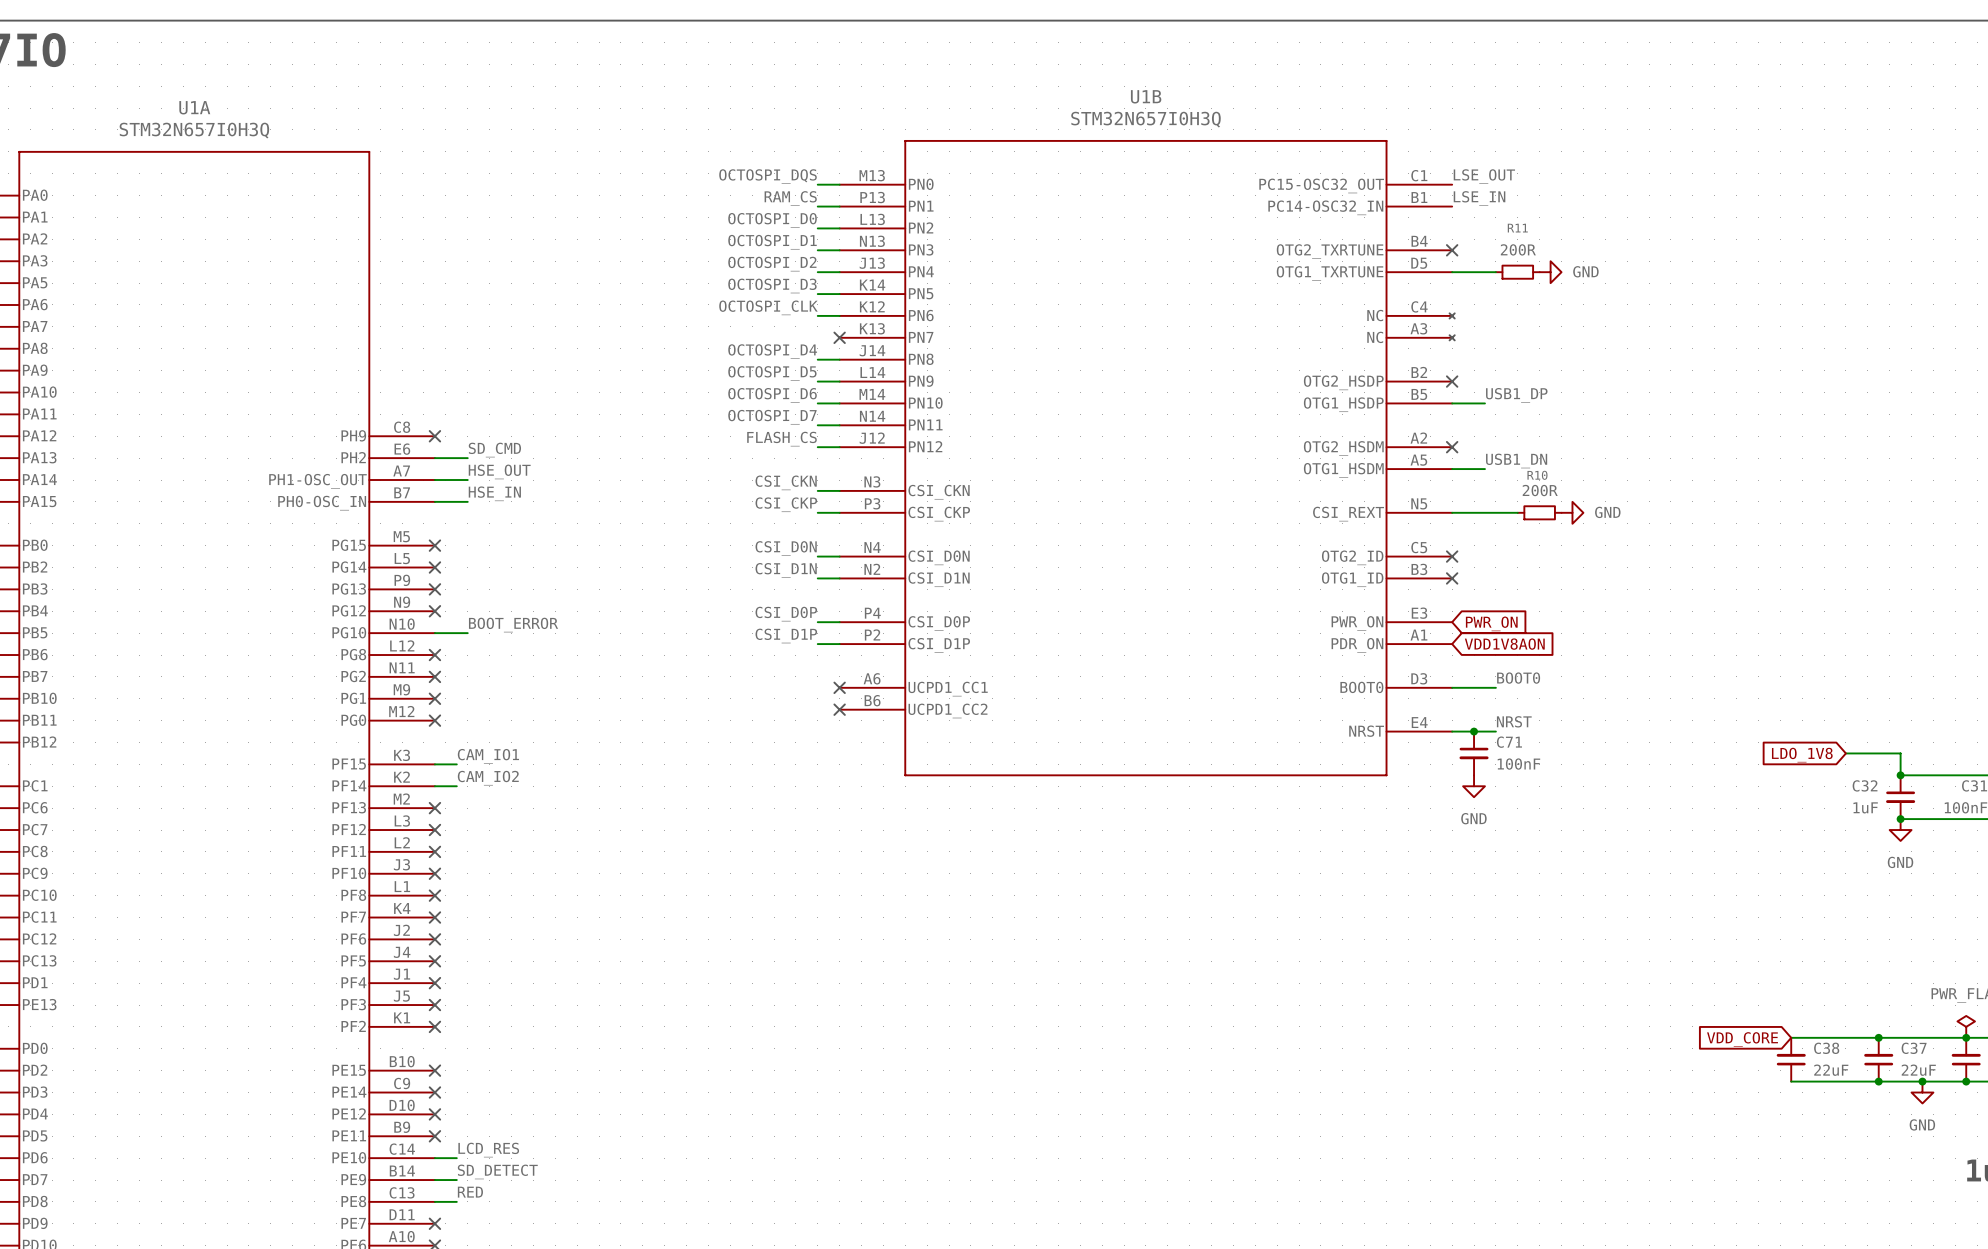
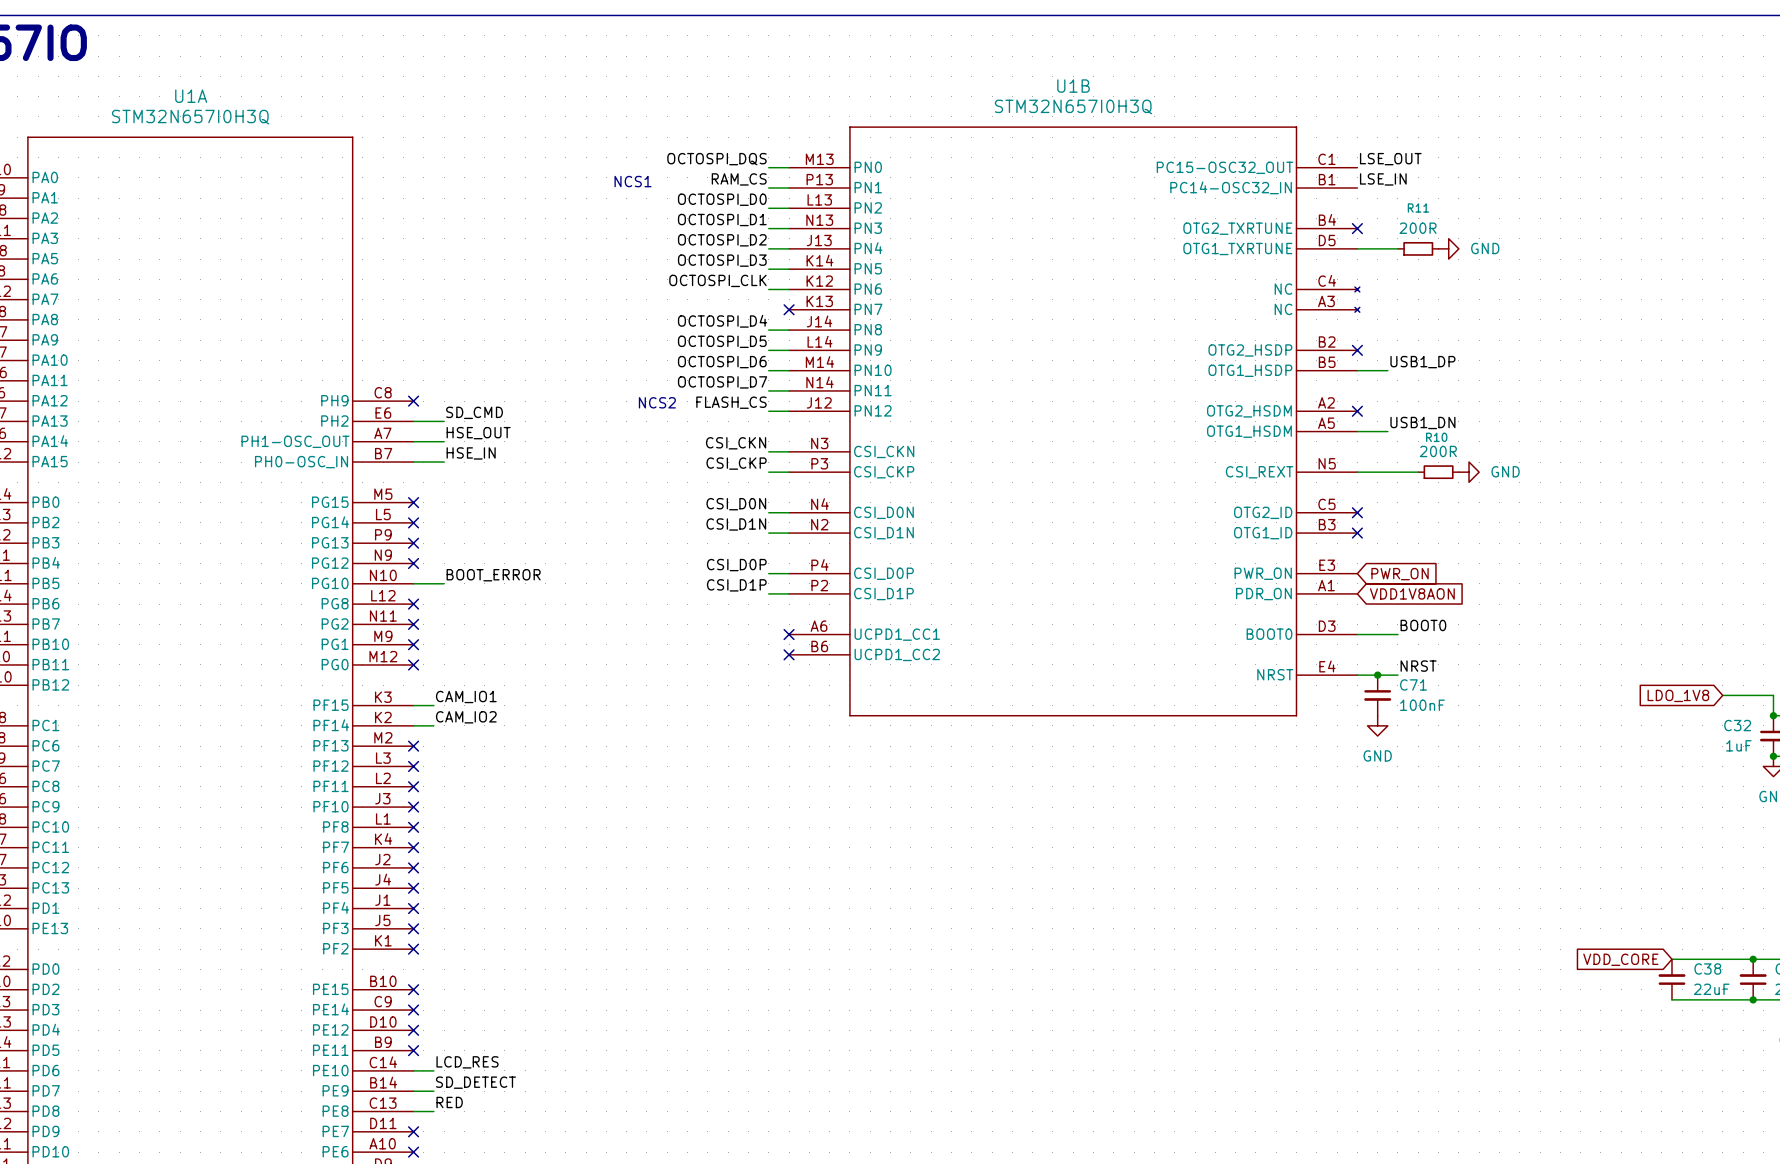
text: none -> NCS1 (633, 181)
text: none -> NCS2 (657, 402)

